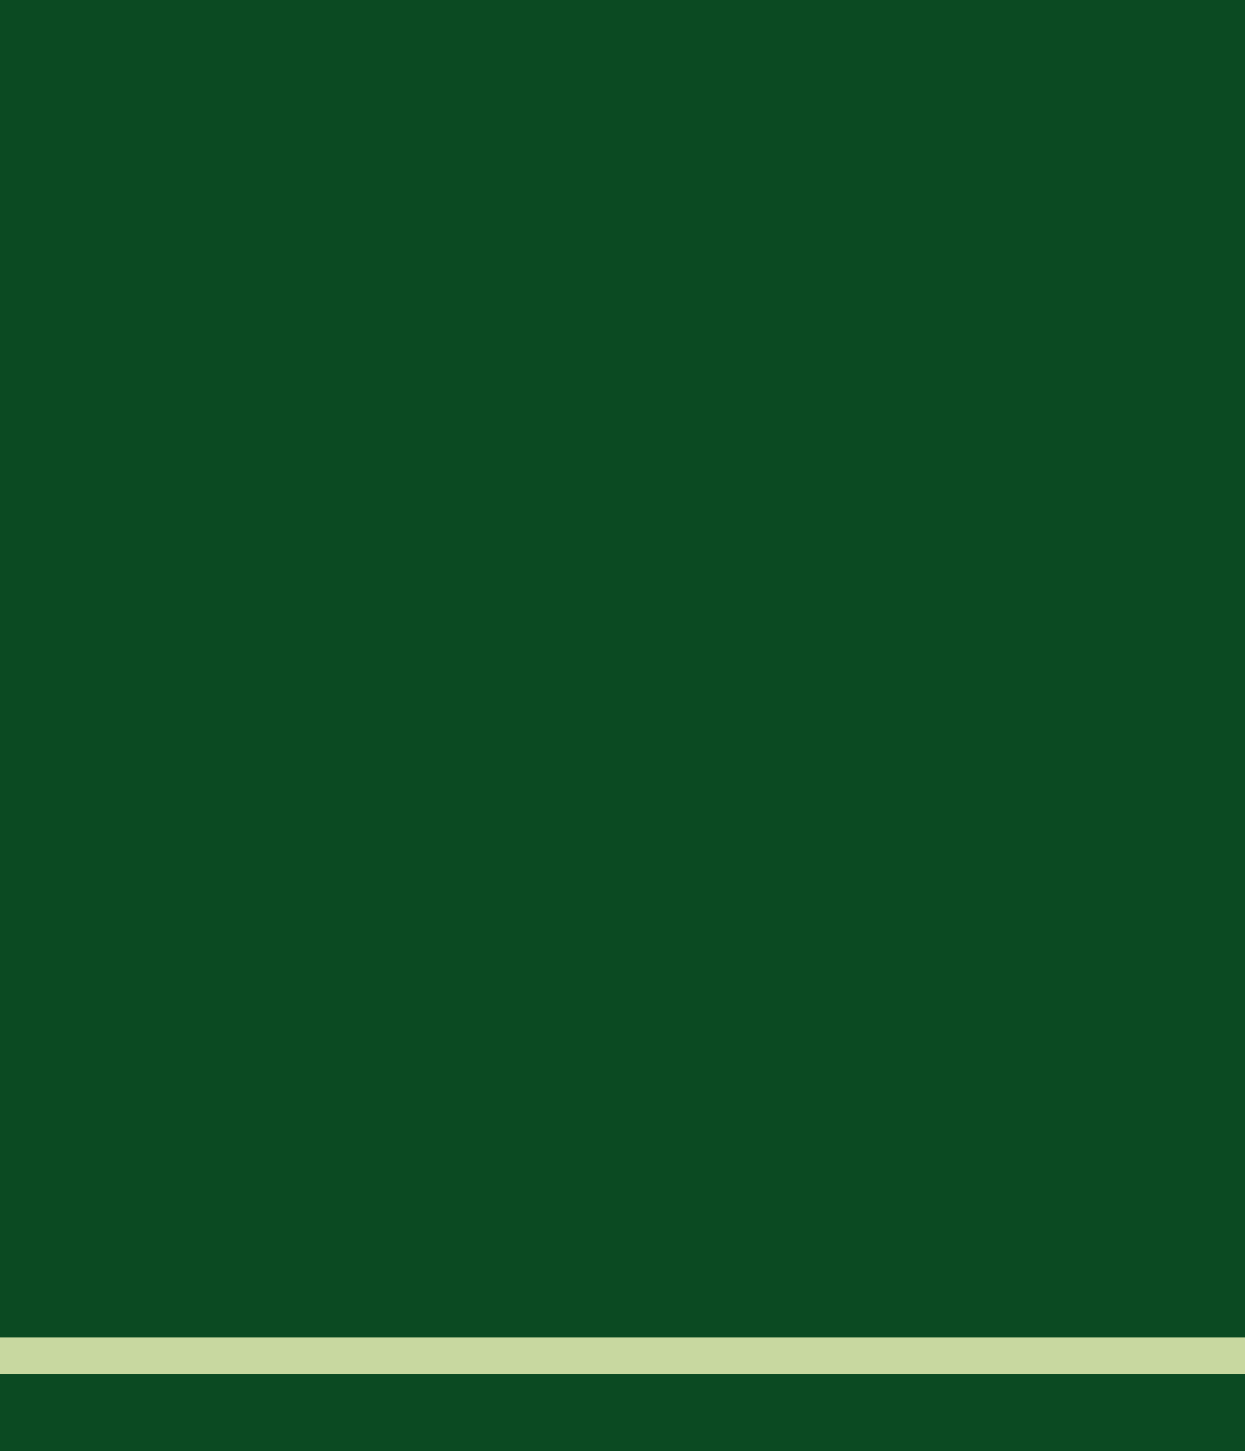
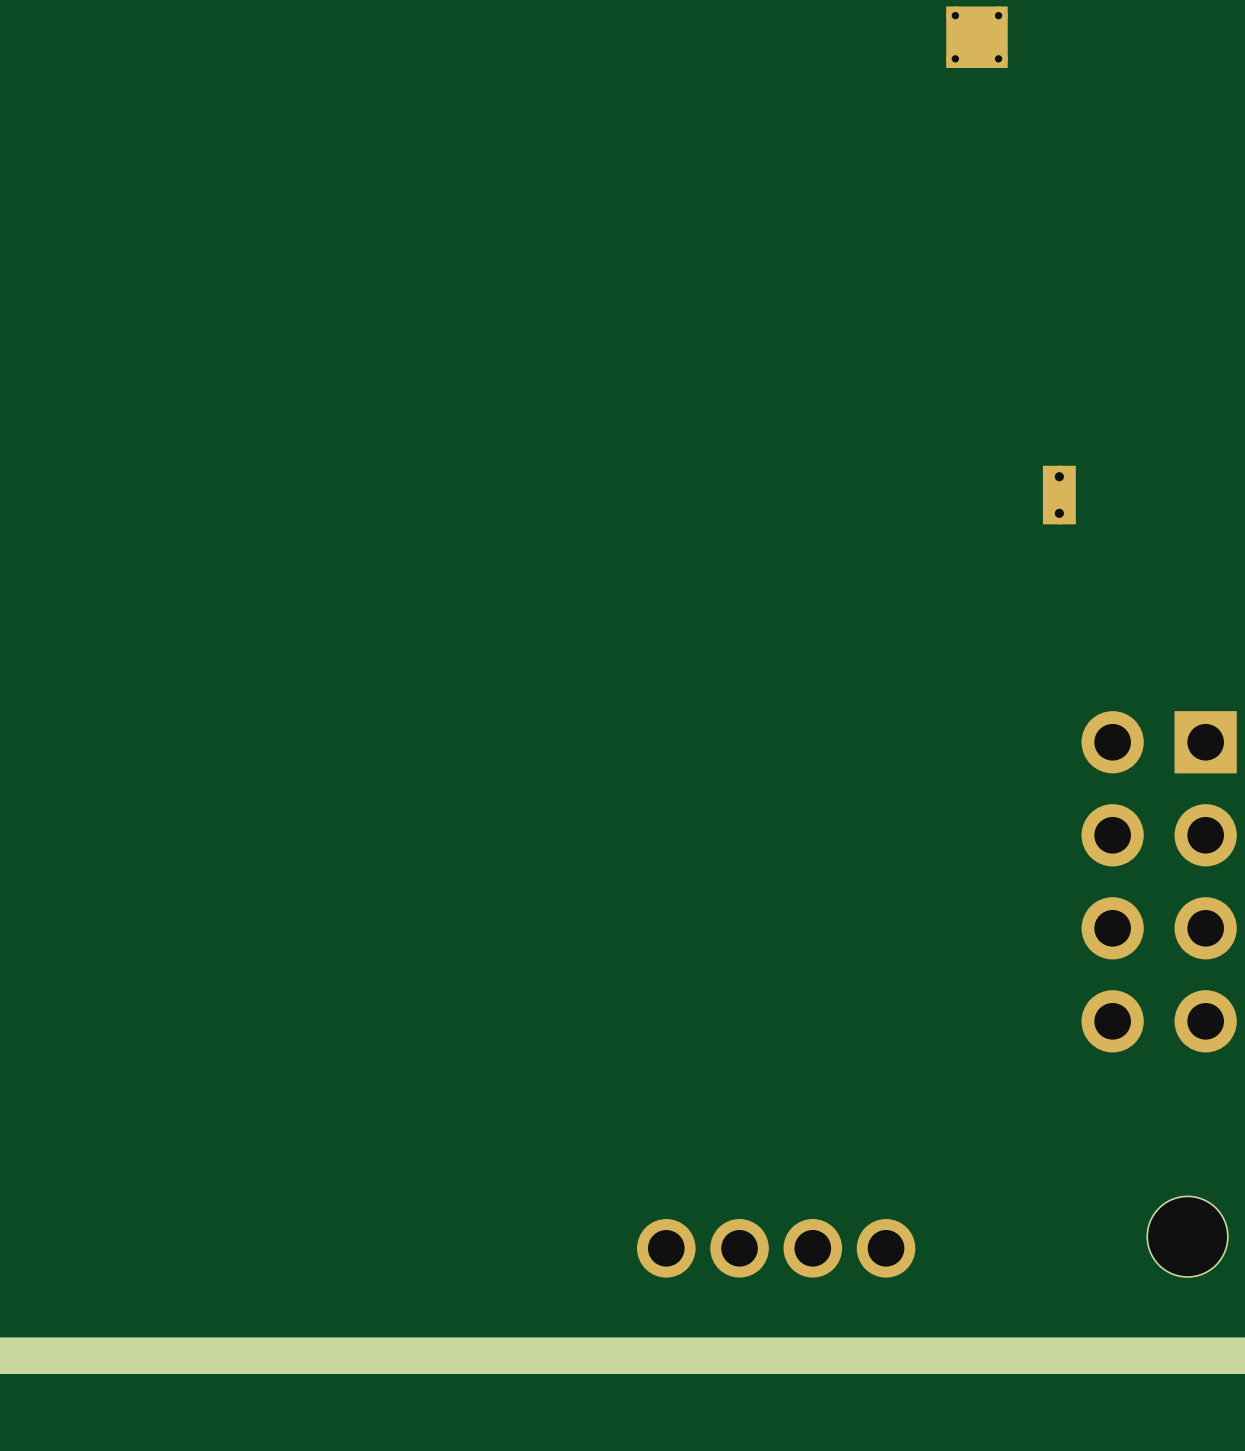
part: none -> (976, 37)
part: none -> (1059, 495)
part: none -> (1159, 881)
part: none -> (1187, 1236)
part: none -> (776, 1248)

